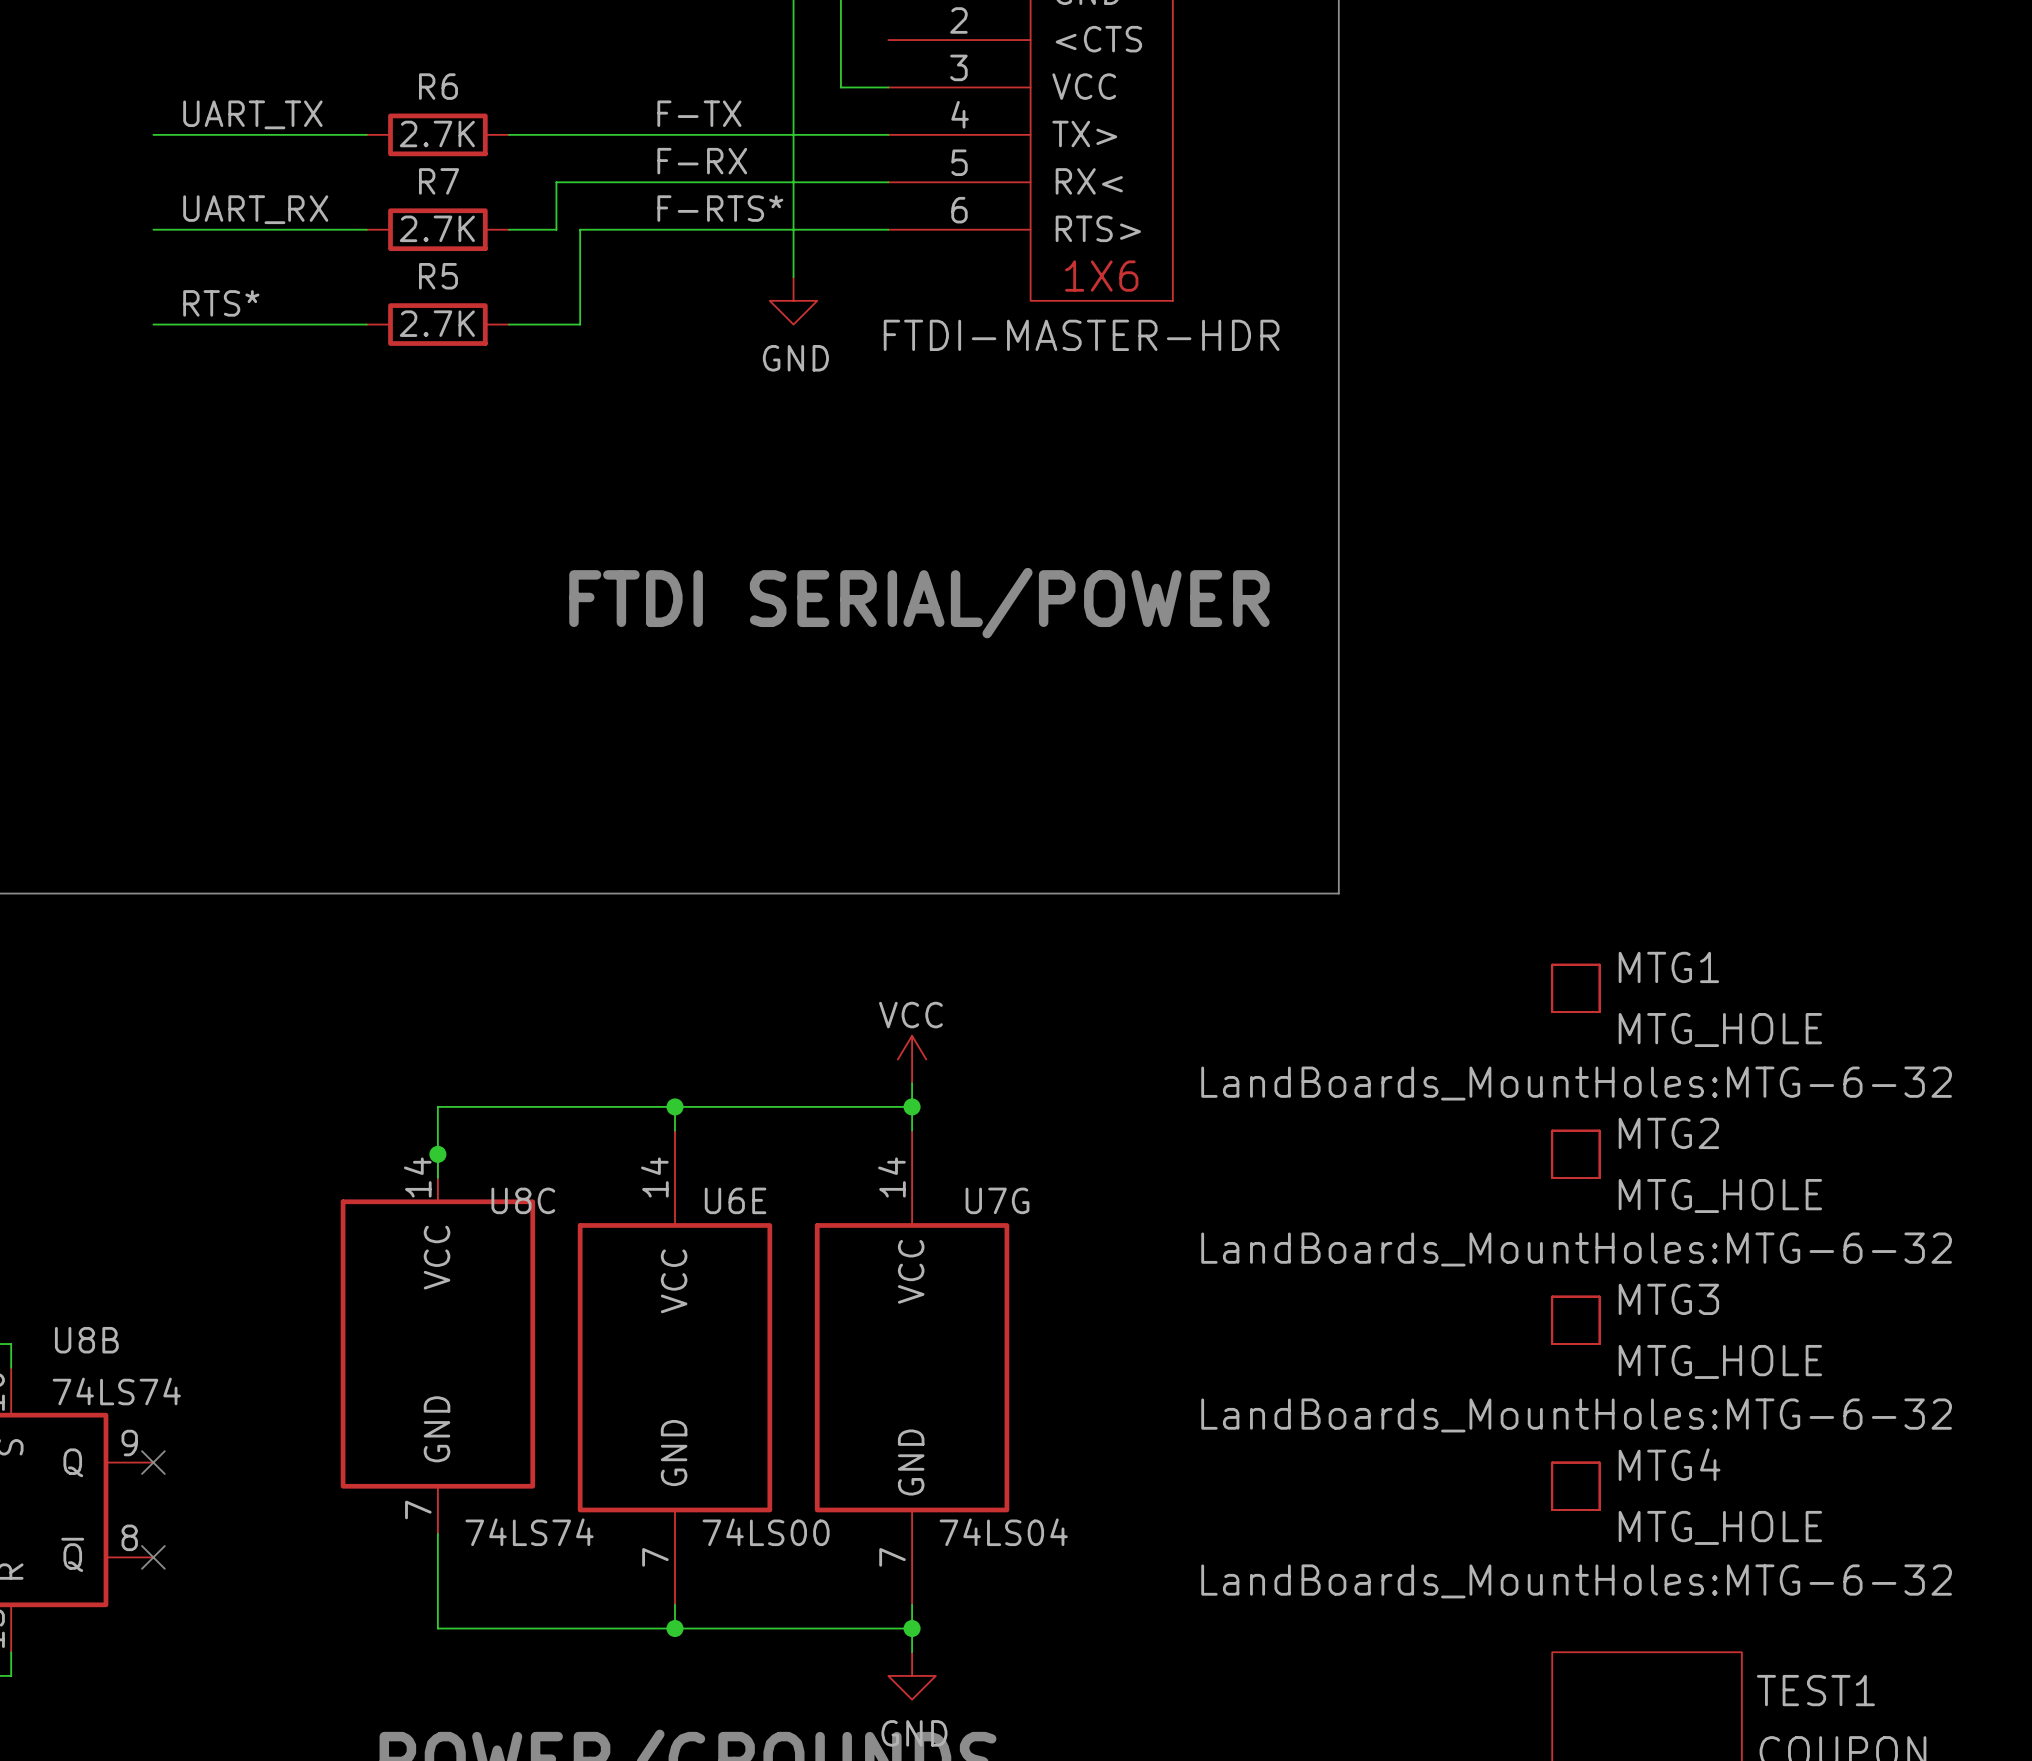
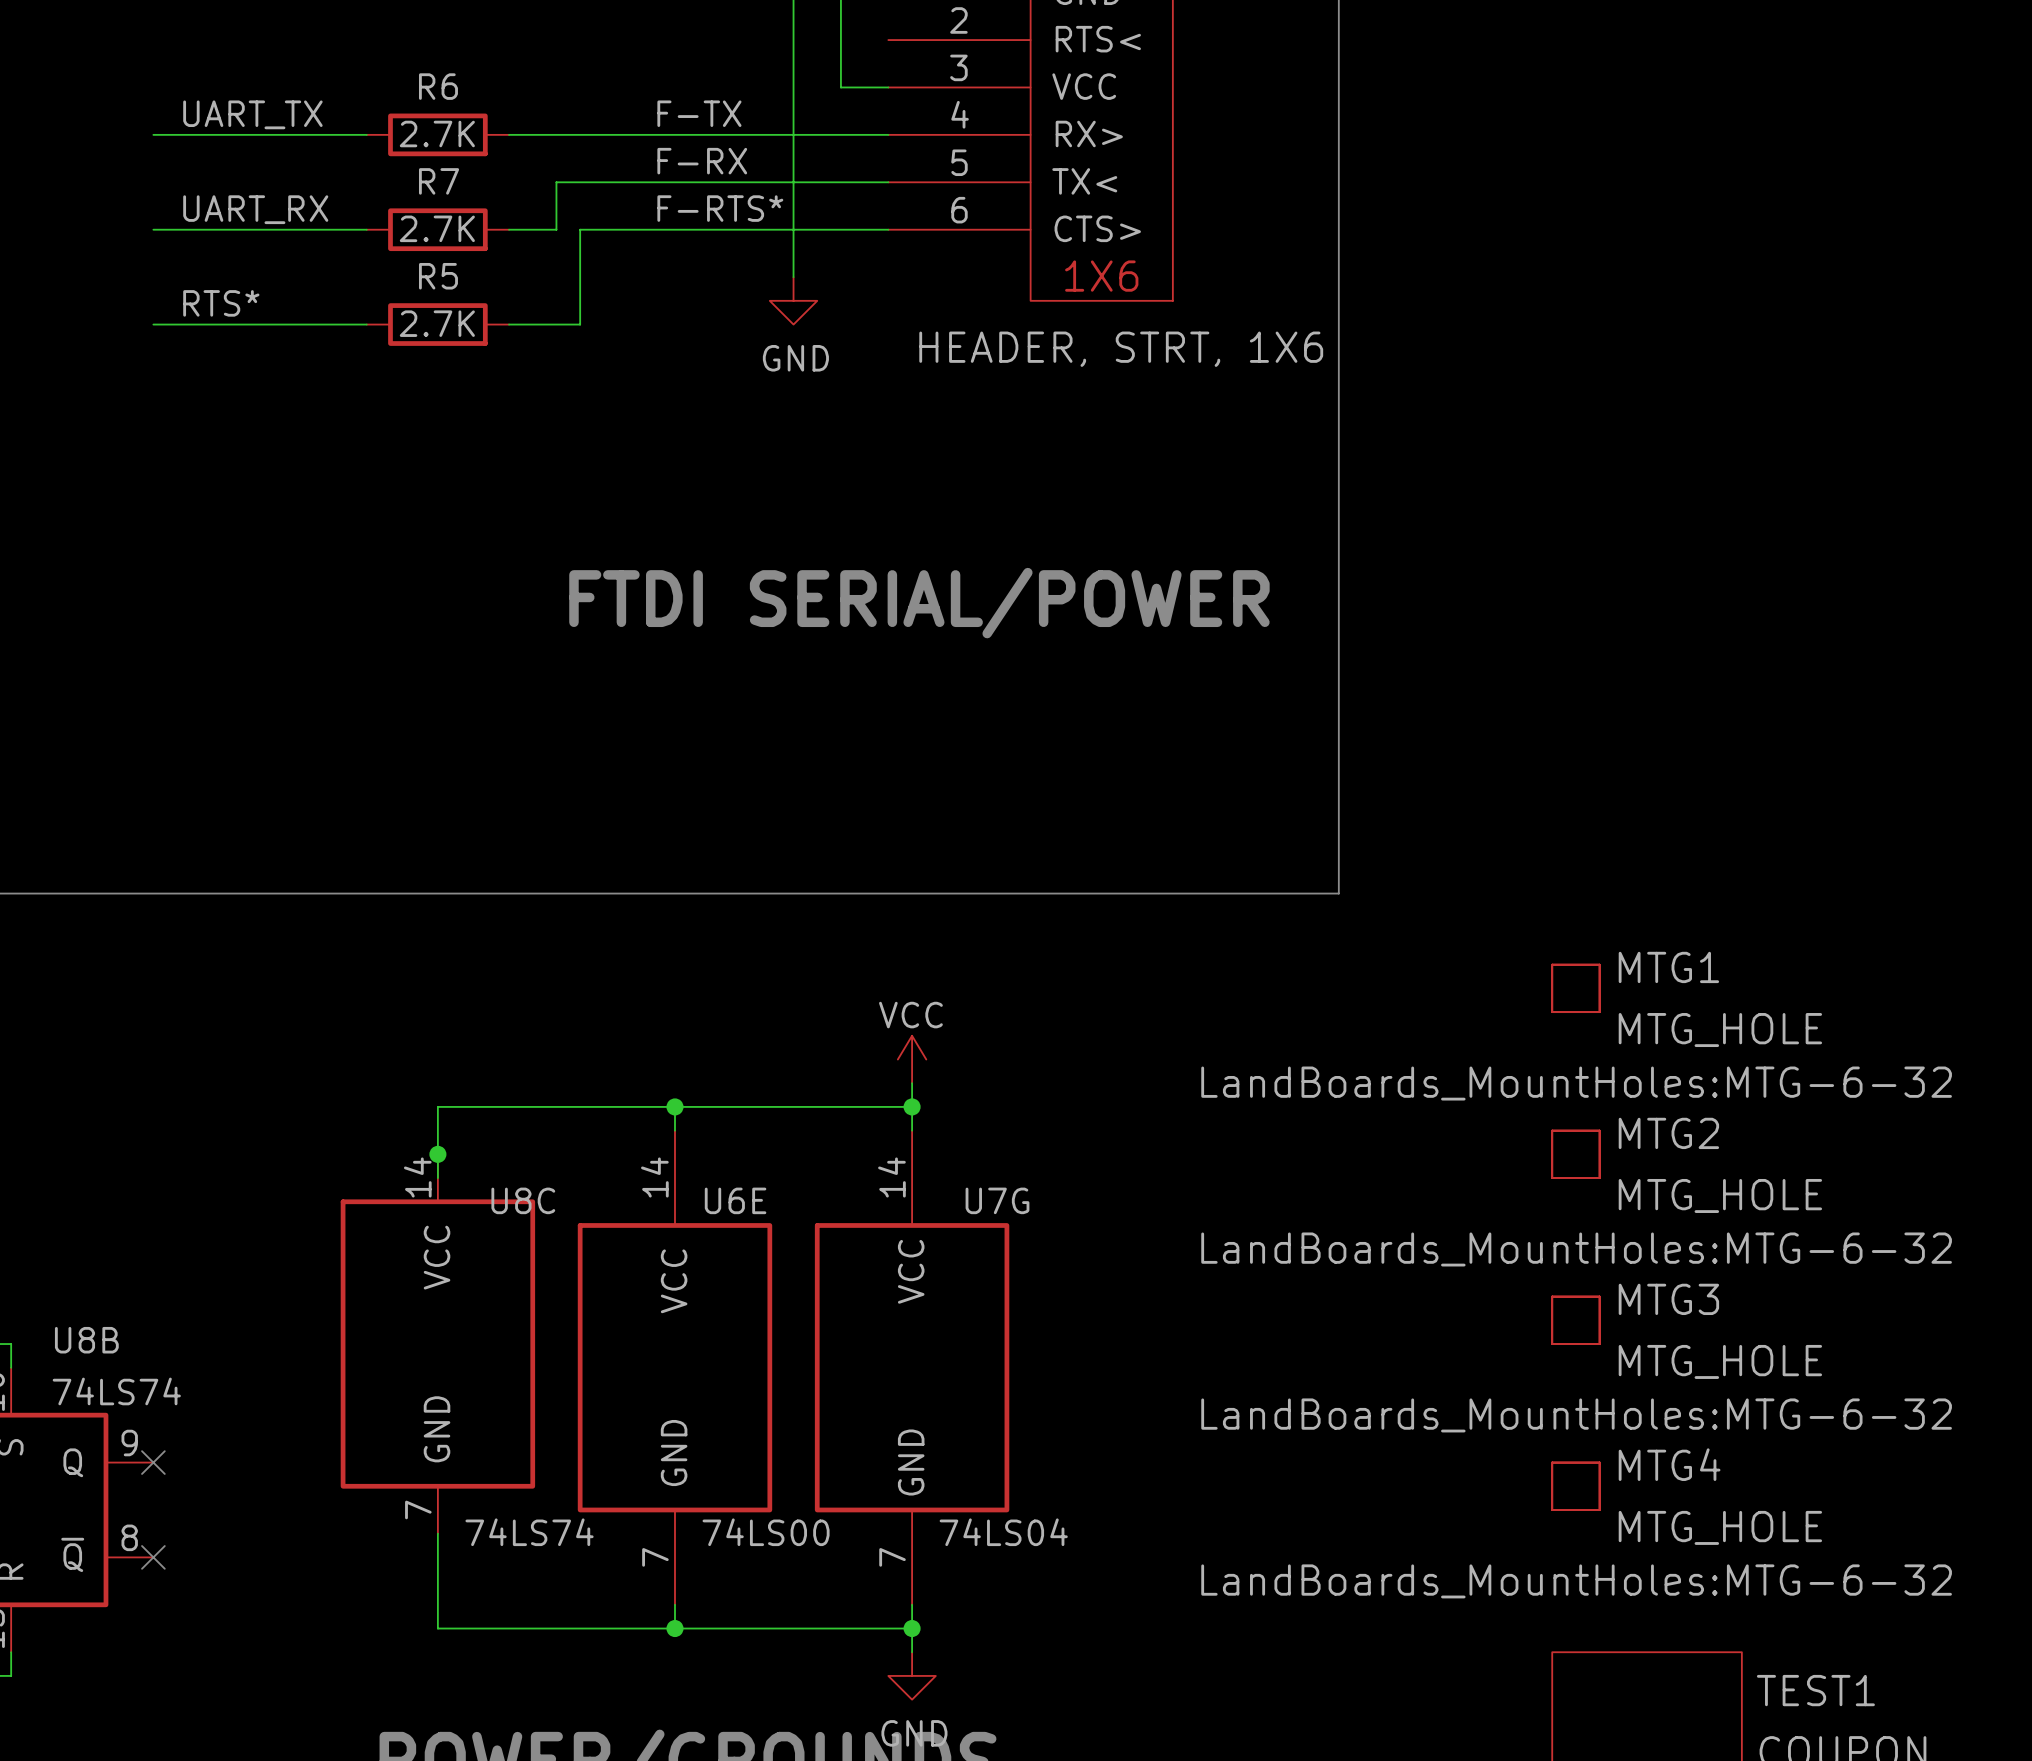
part pin name: <CTS (1098, 39) -> RTS< (1098, 39)
part pin name: TX> (1084, 133) -> RX> (1089, 133)
part pin name: RX< (1089, 181) -> TX< (1084, 181)
part pin name: RTS> (1098, 228) -> CTS> (1097, 228)
part value: FTDI-MASTER-HDR (1081, 335) -> HEADER, STRT, 1X6 (1121, 349)

